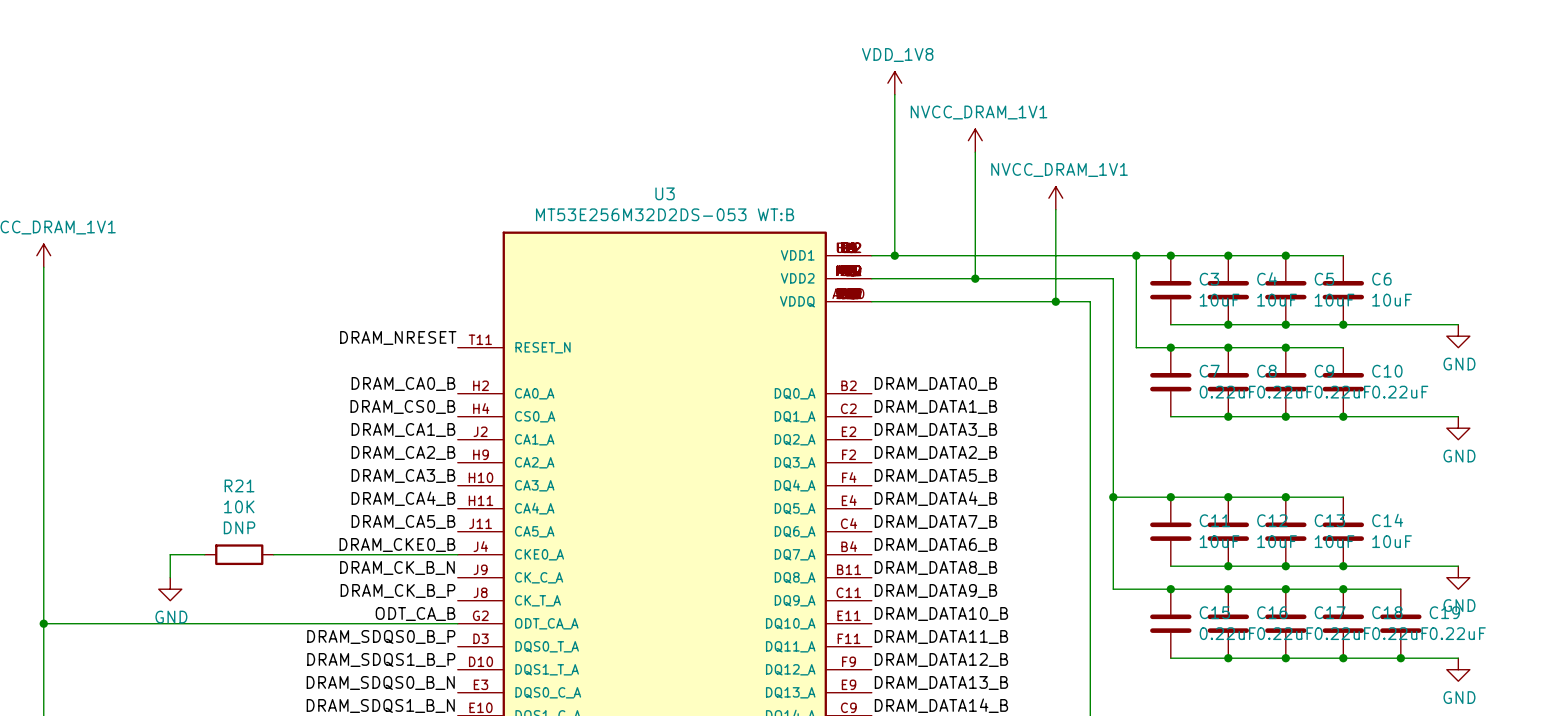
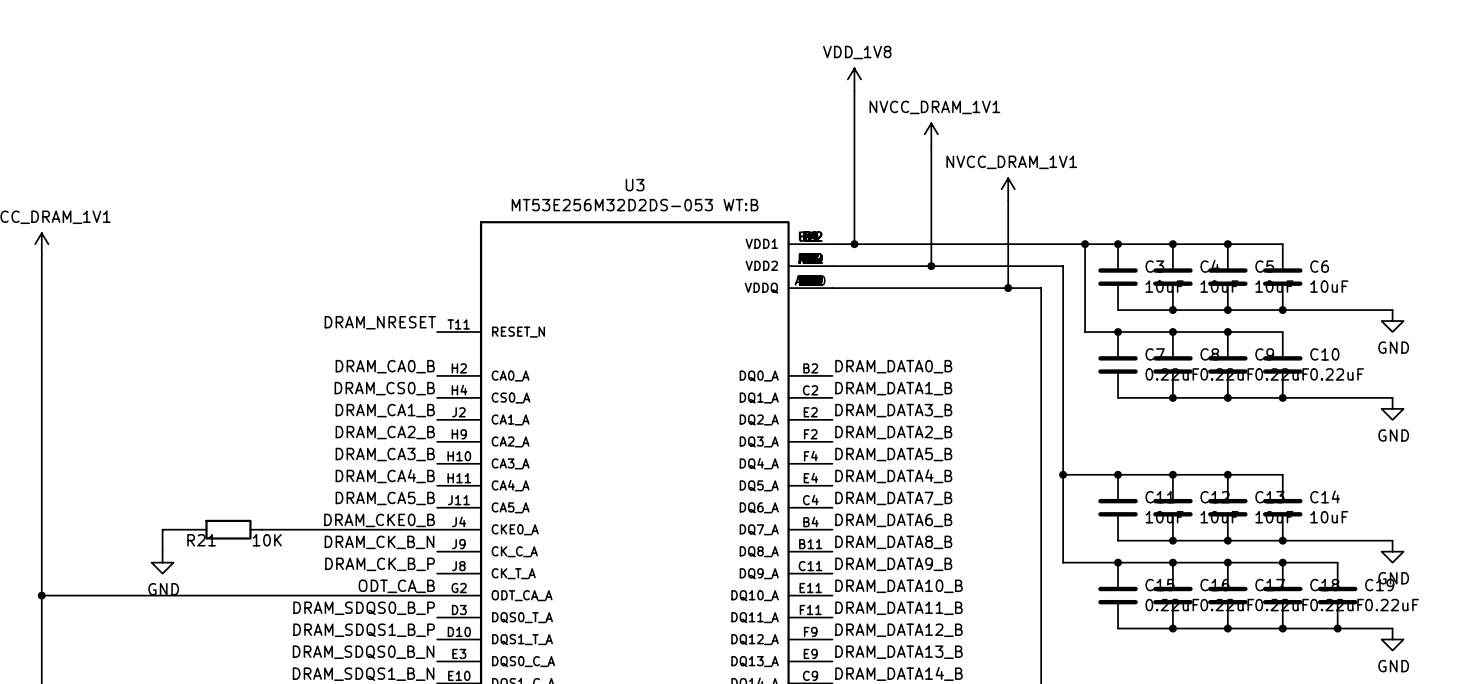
R21 name position: R21 (239, 485) -> R21 (201, 540)
R21 value position: 10K (239, 506) -> 10K (267, 540)
R21 text: DNP (239, 527) -> none

